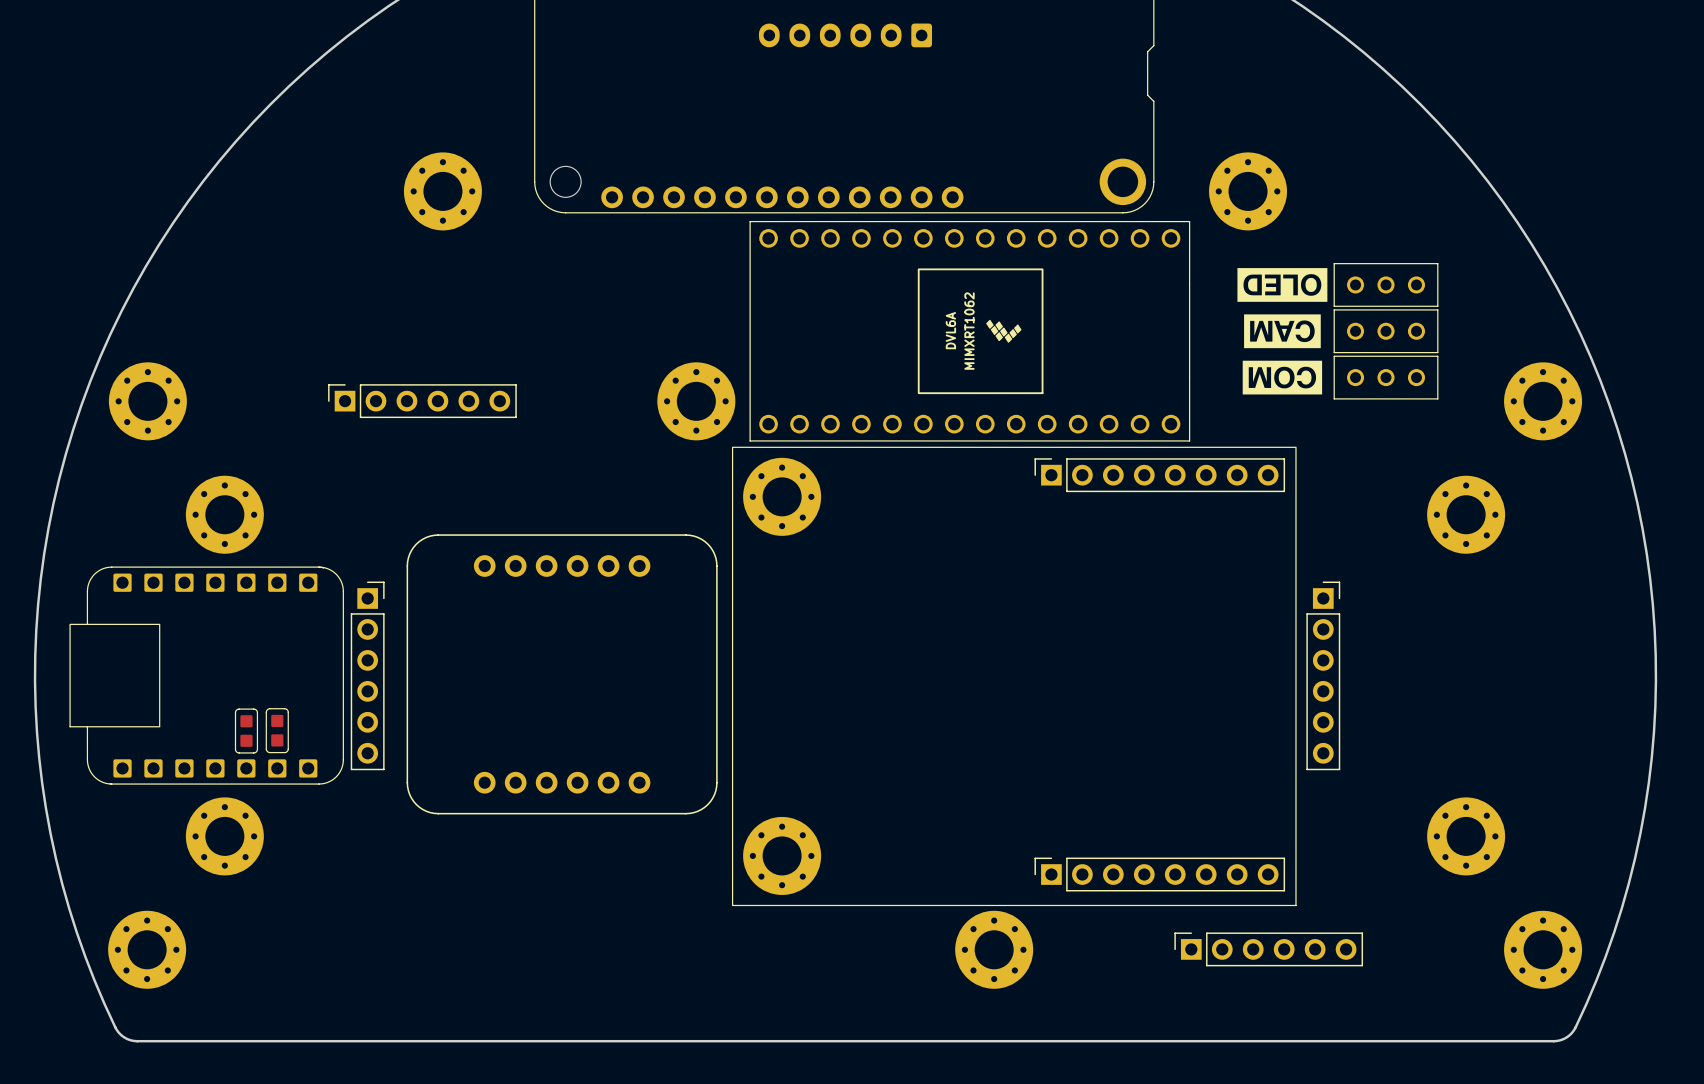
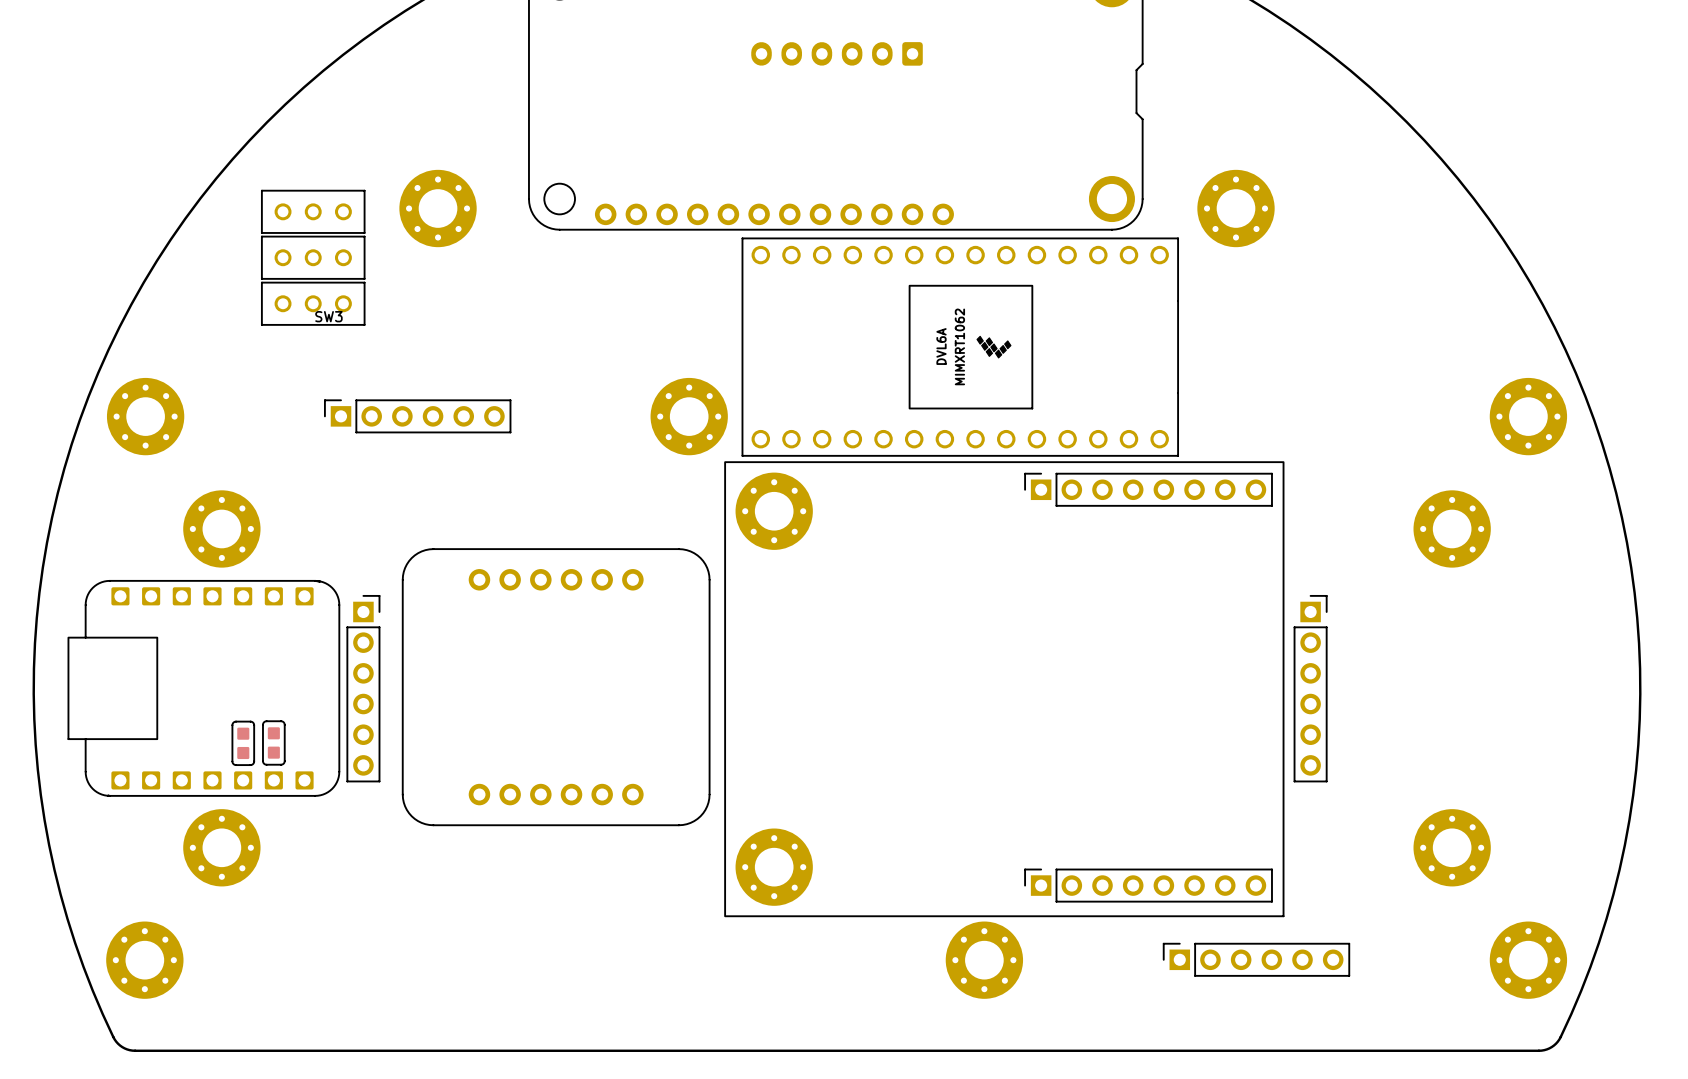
part: none -> (313, 211)
part: none -> (313, 257)
drawing: [1237, 268, 1328, 395] -> none
part: (1386, 284) -> none
SW3: none -> (313, 303)
part: (1386, 331) -> none
part: (1386, 377) -> none

